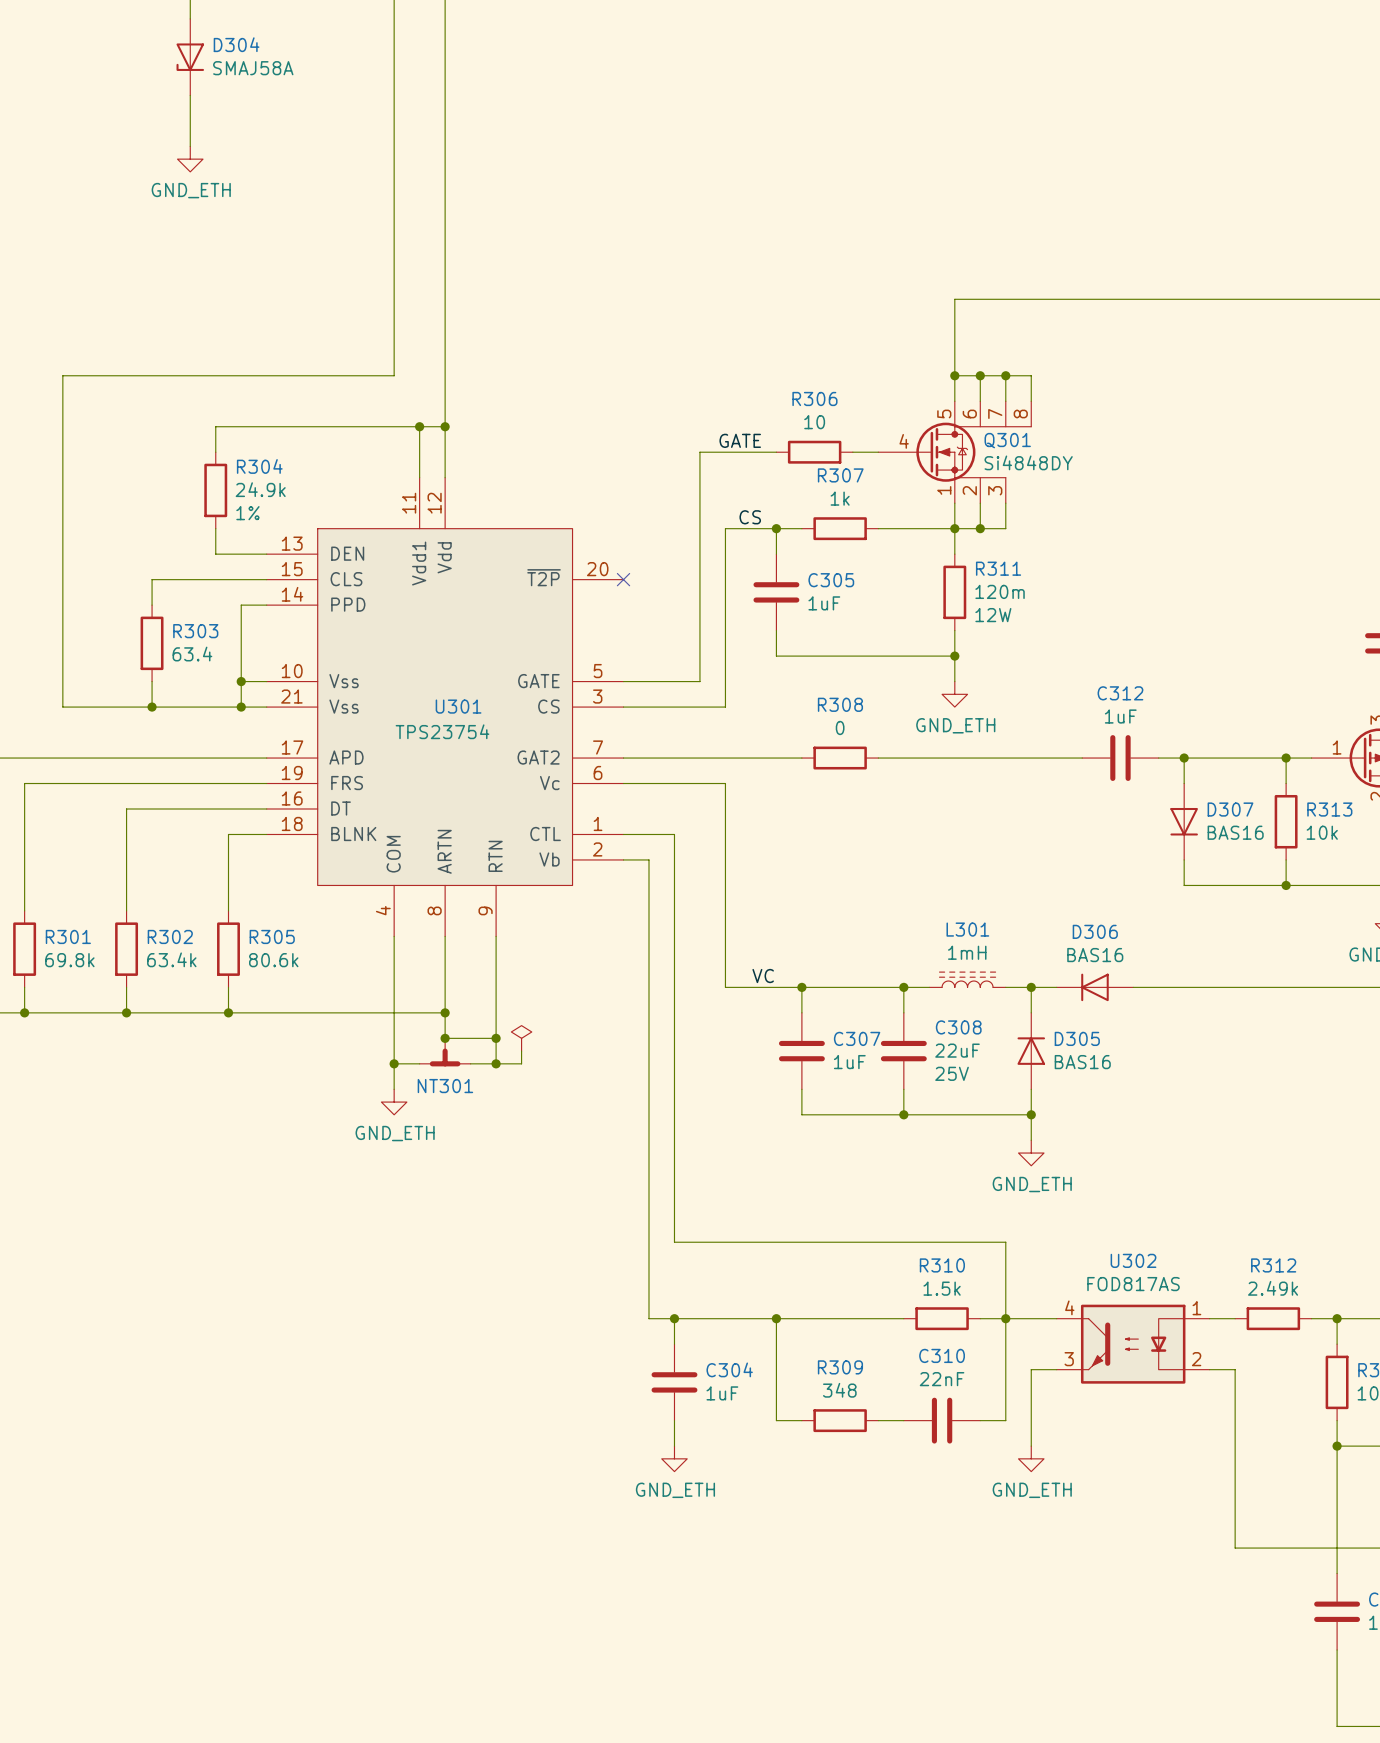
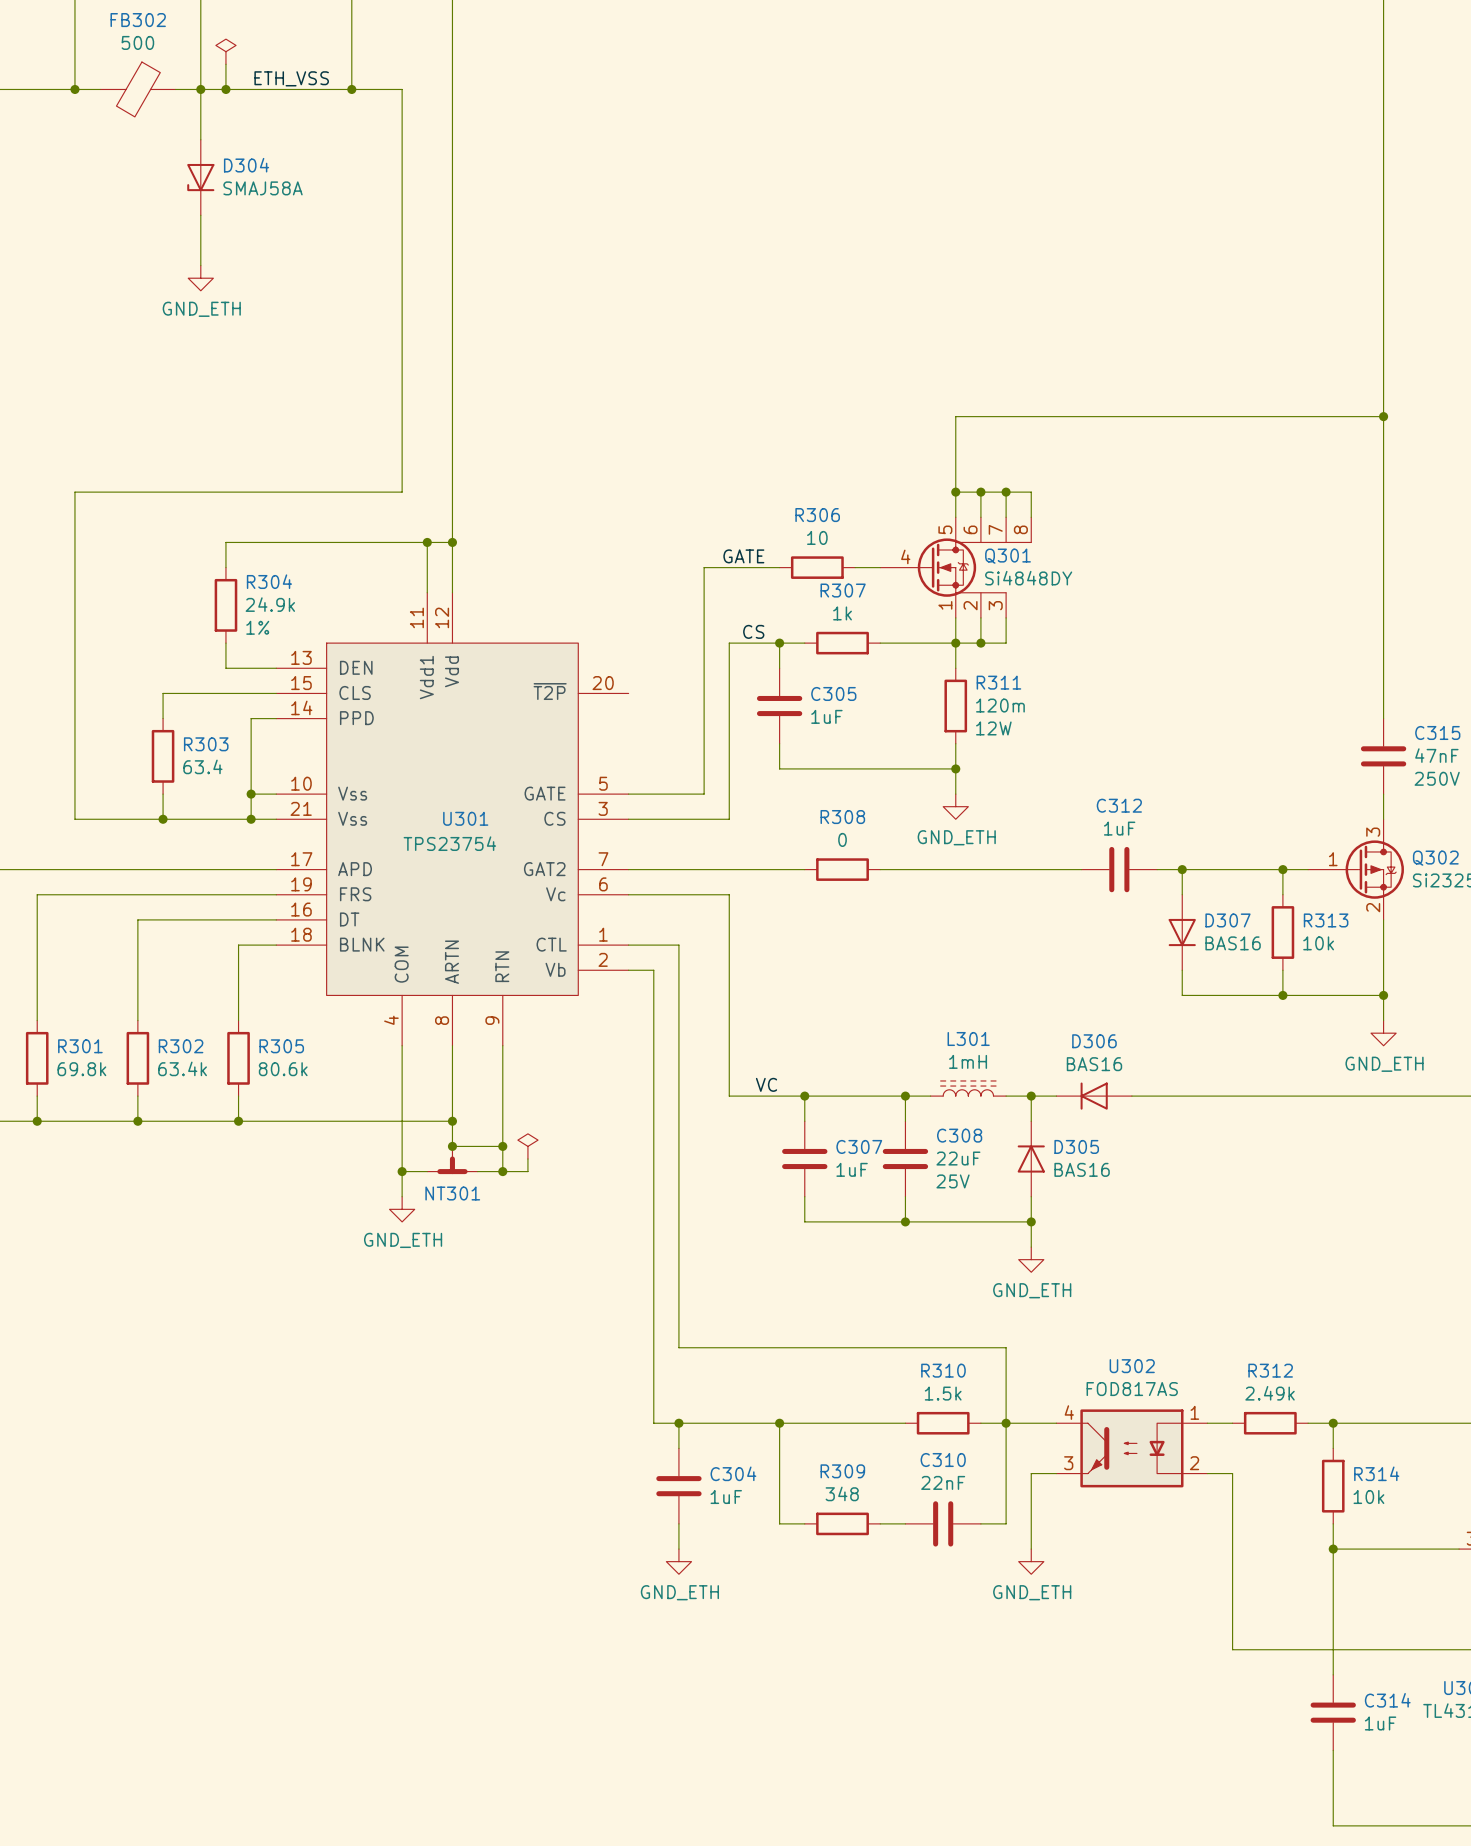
no-connect mark: (623, 579) -> none

